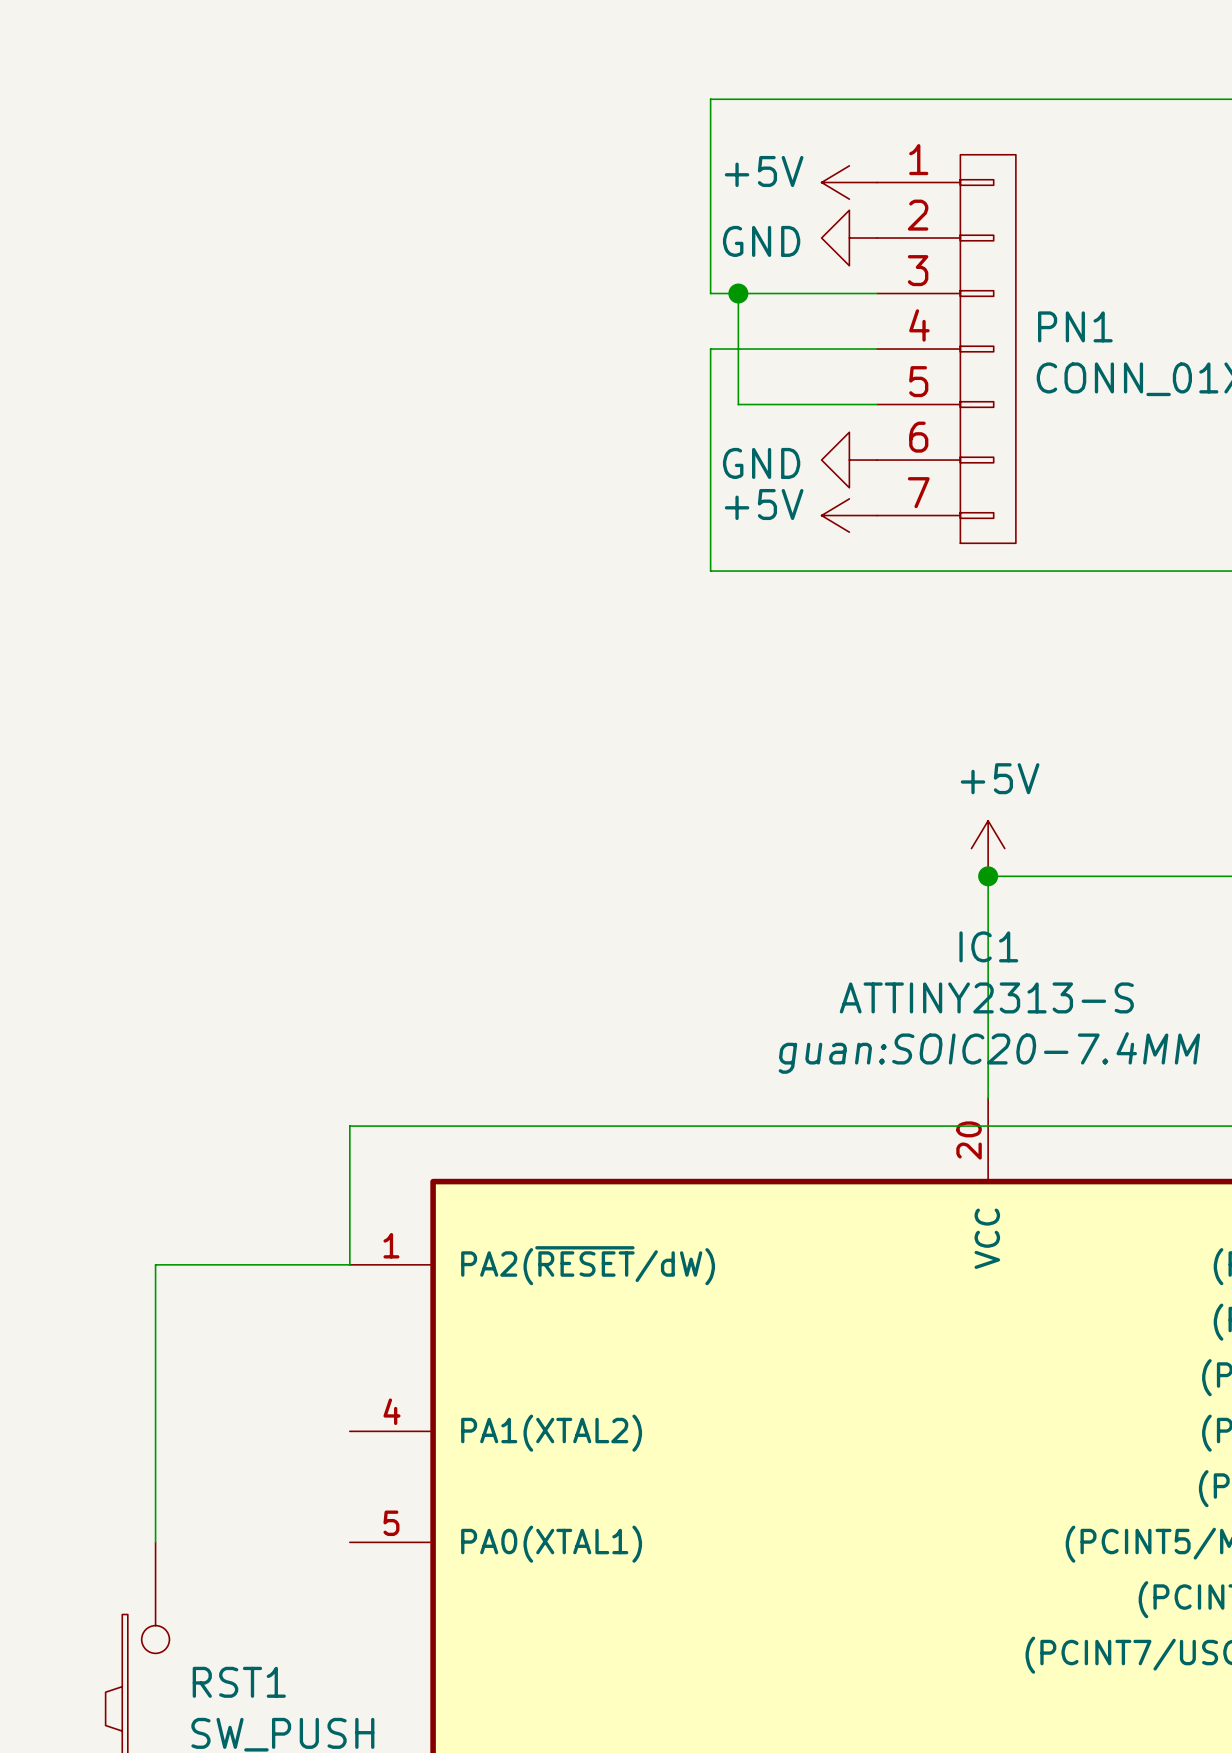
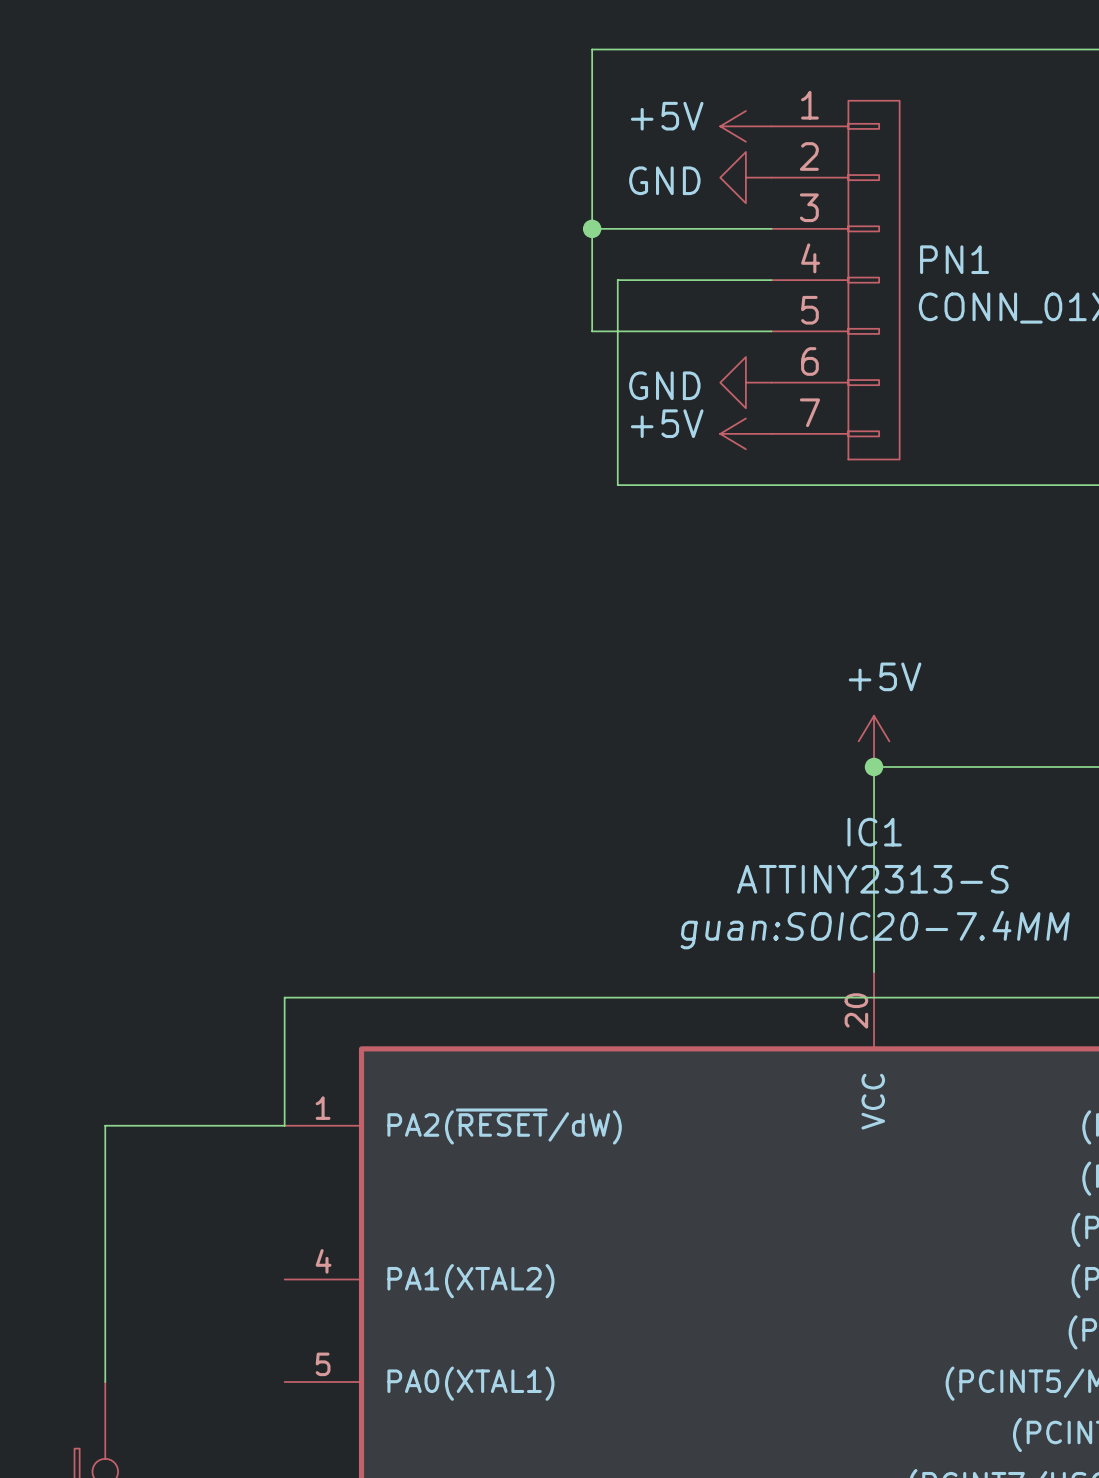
wire: (710, 99) (710, 293) -> (617, 49) (592, 49) (592, 331) (643, 331)
wire: none -> (592, 228) (617, 228)
wire: (738, 293) (738, 404) -> none
junction position: (738, 293) -> (592, 228)

